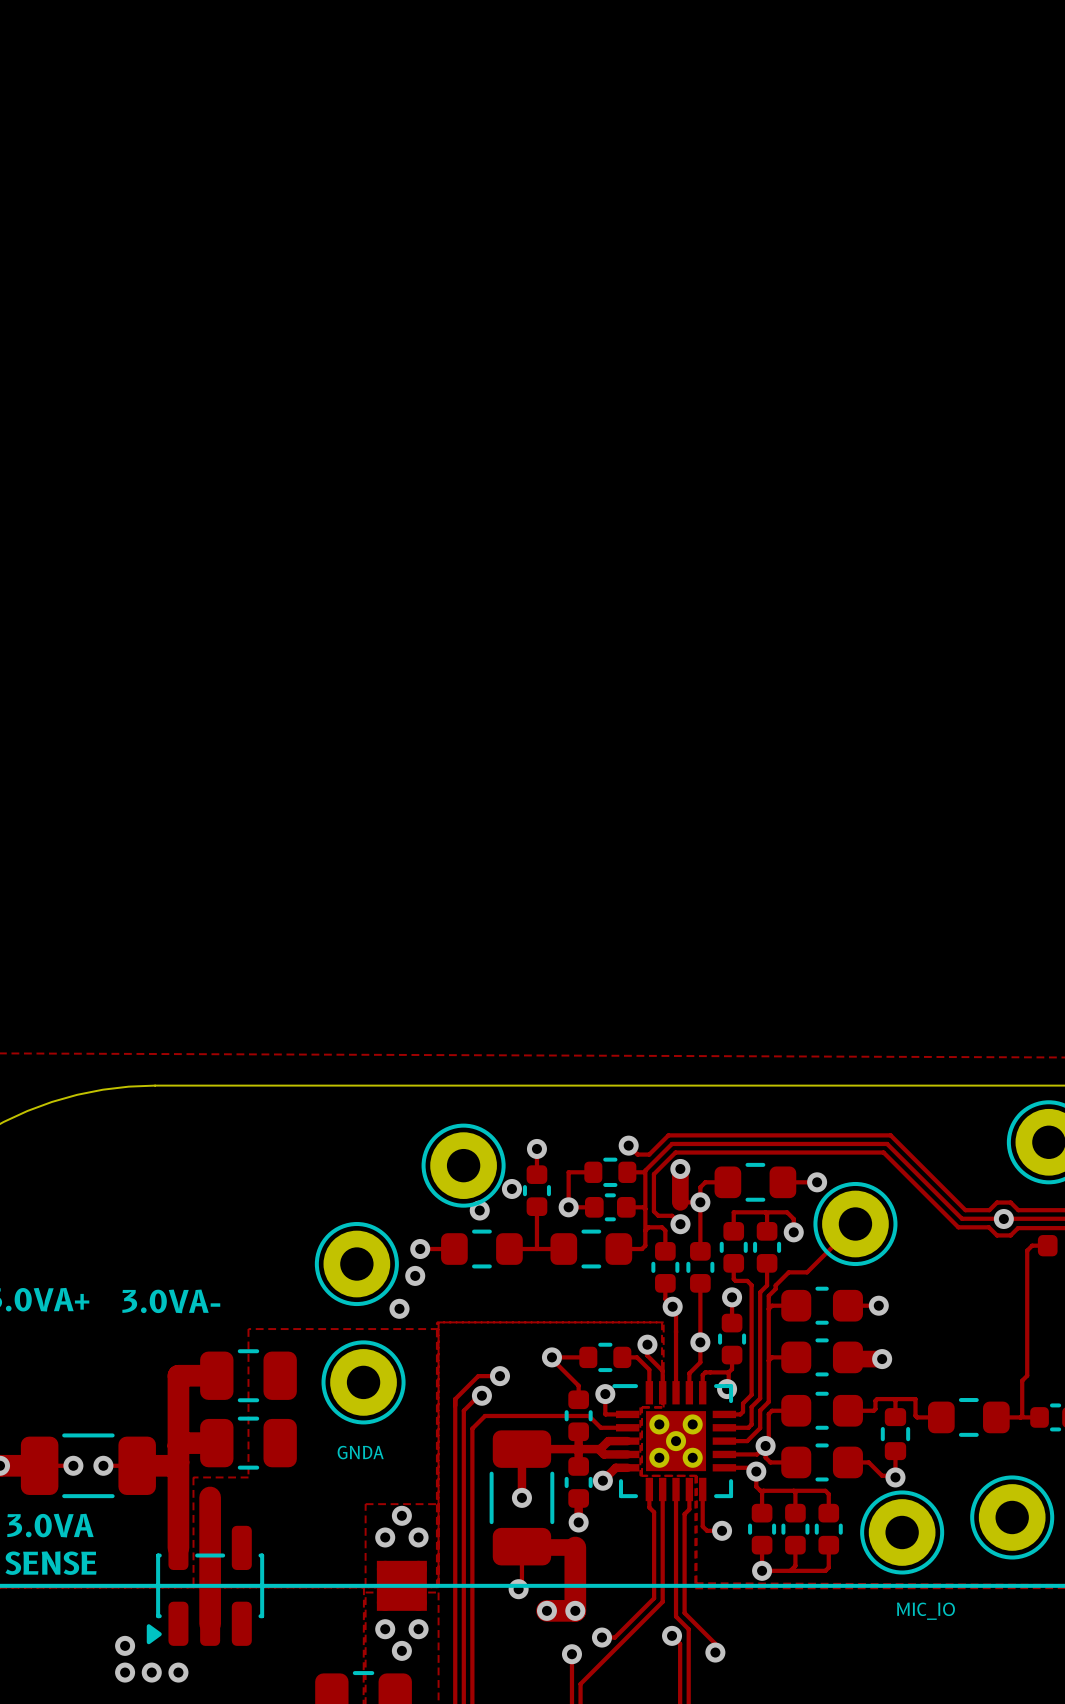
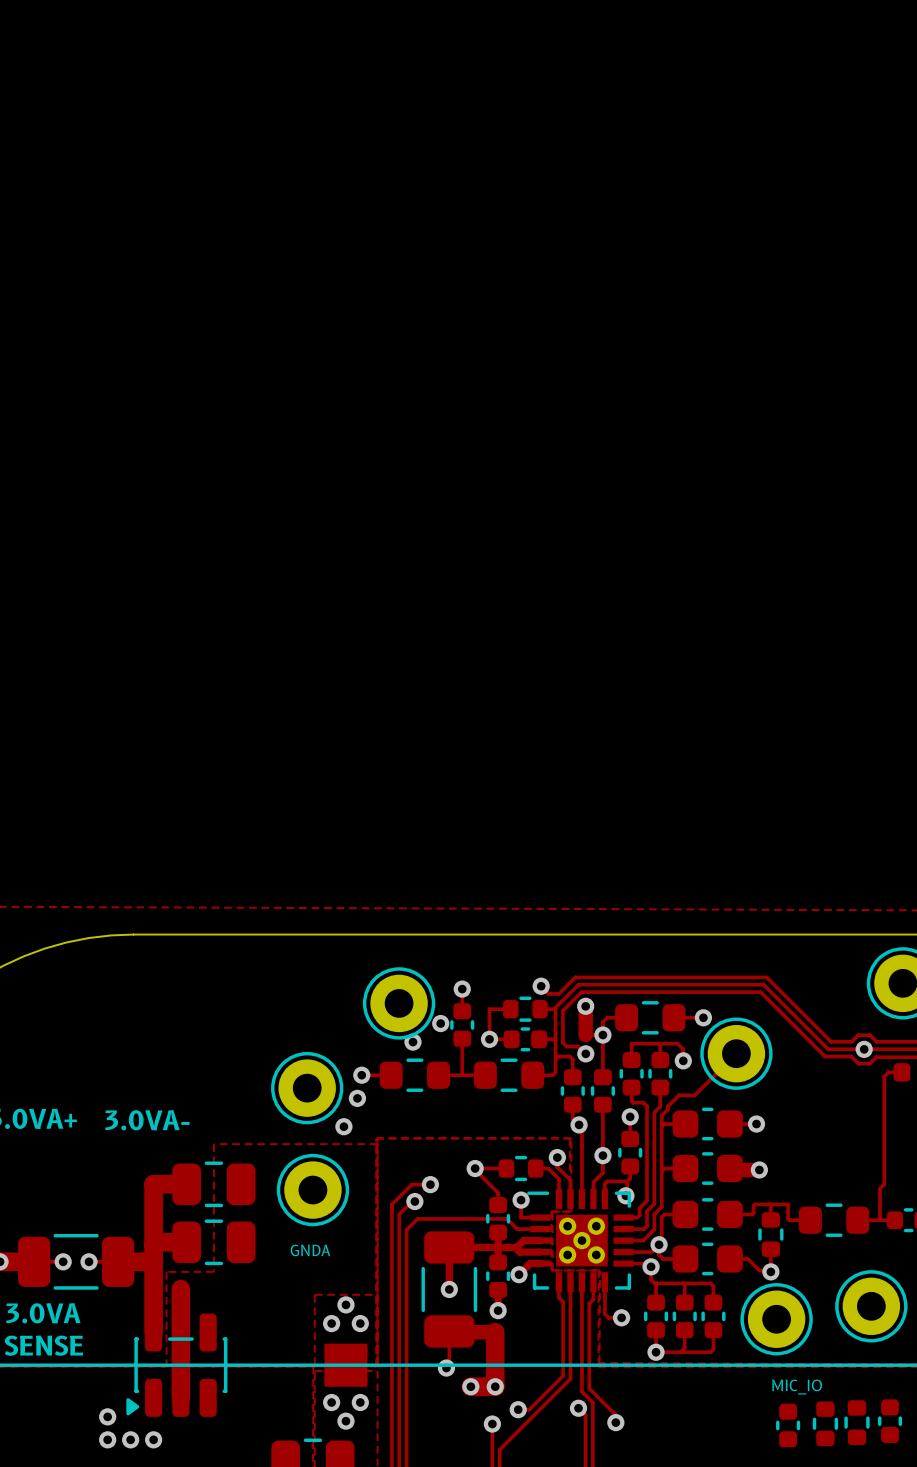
part: none -> (890, 1421)
part: none -> (857, 1422)
part: none -> (825, 1423)
part: none -> (788, 1425)

